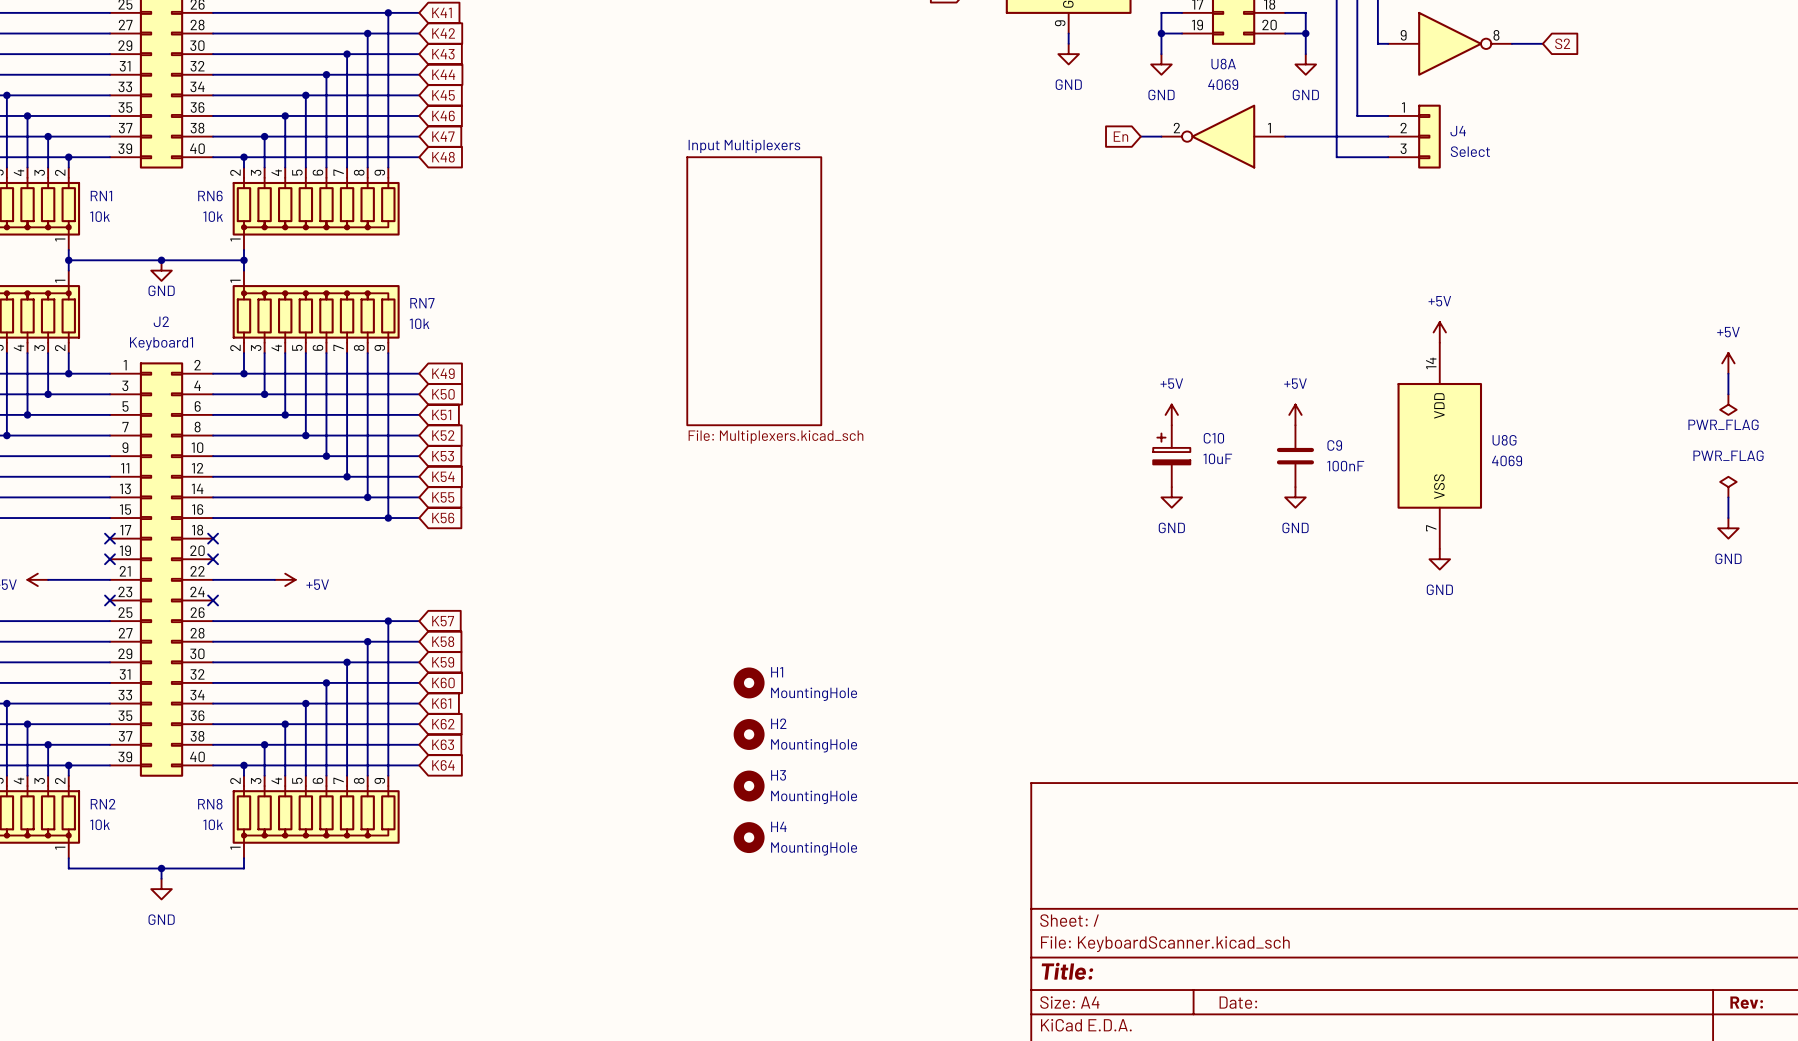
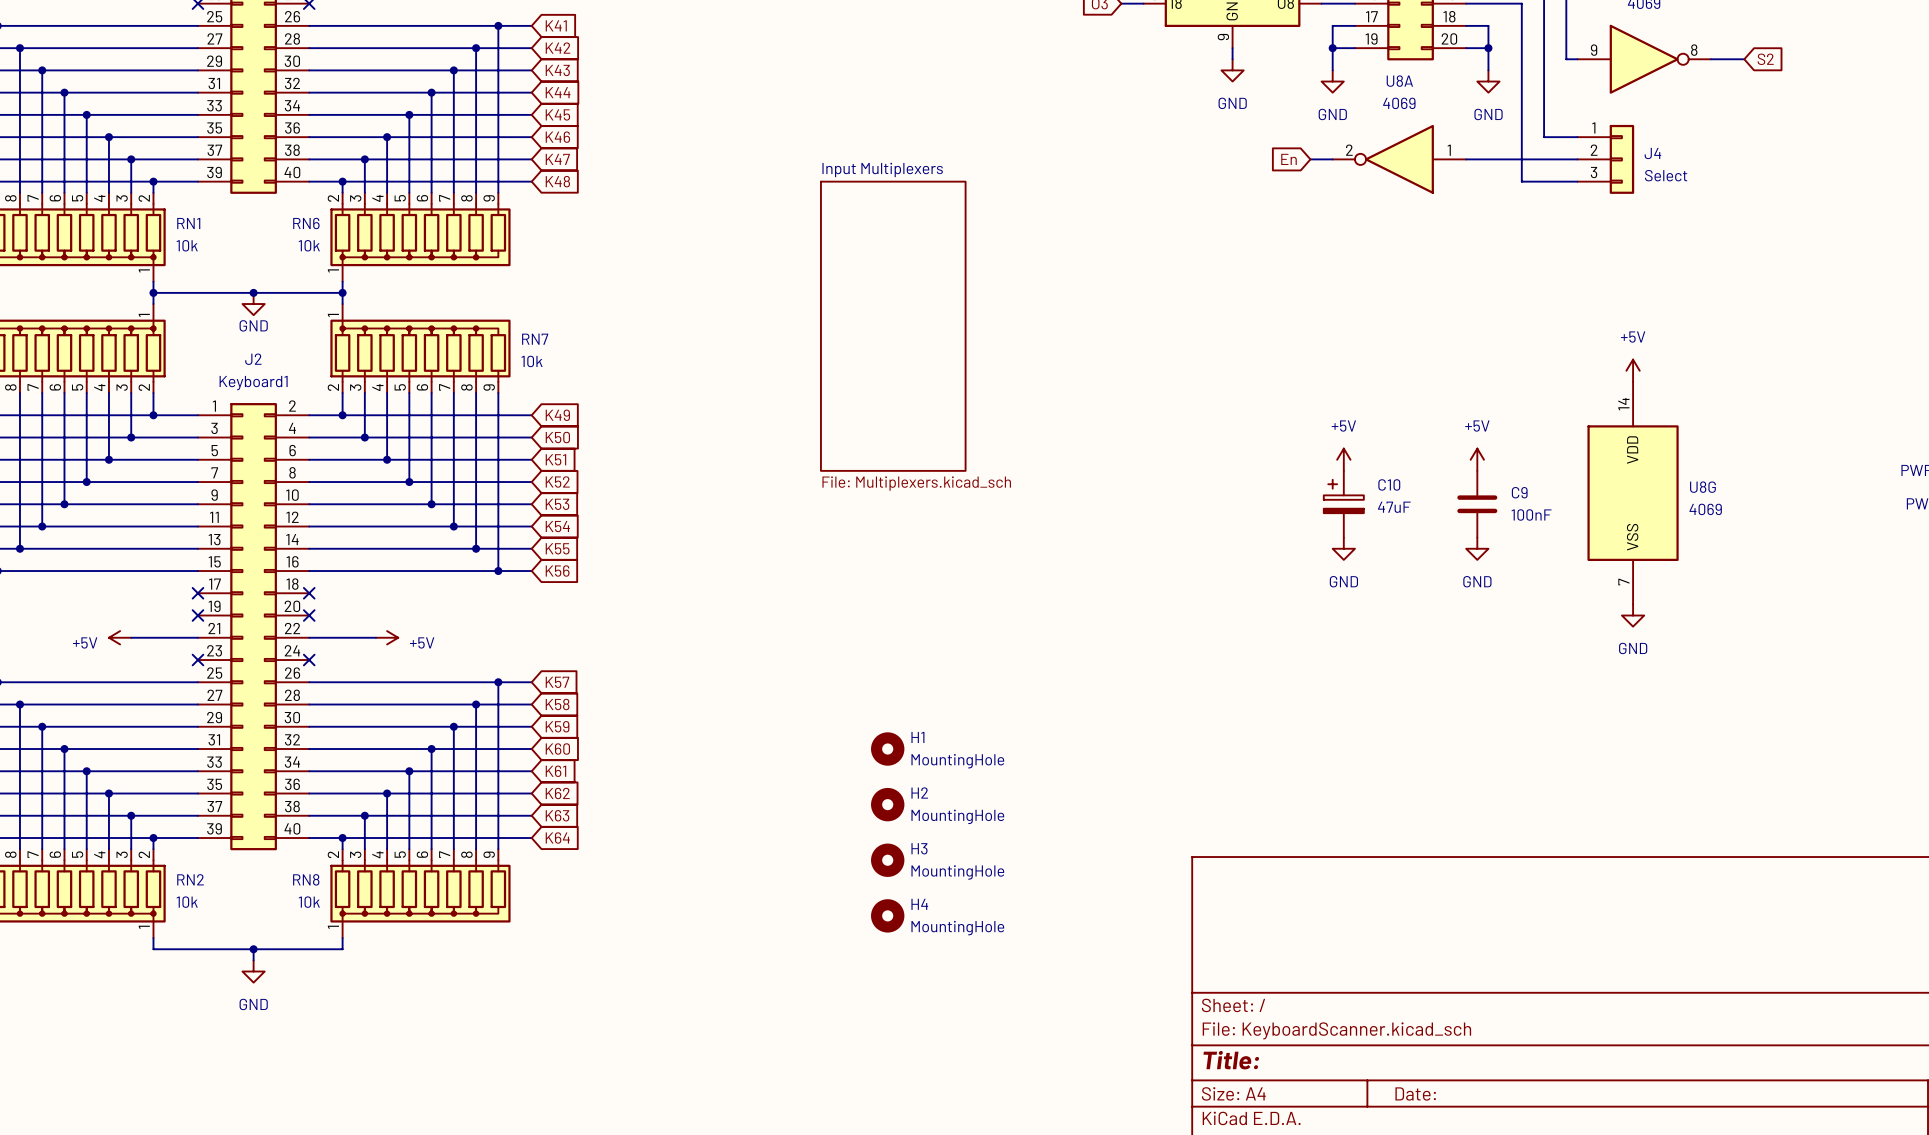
C10 value: 10uF (1217, 458) -> 47uF (1394, 507)

